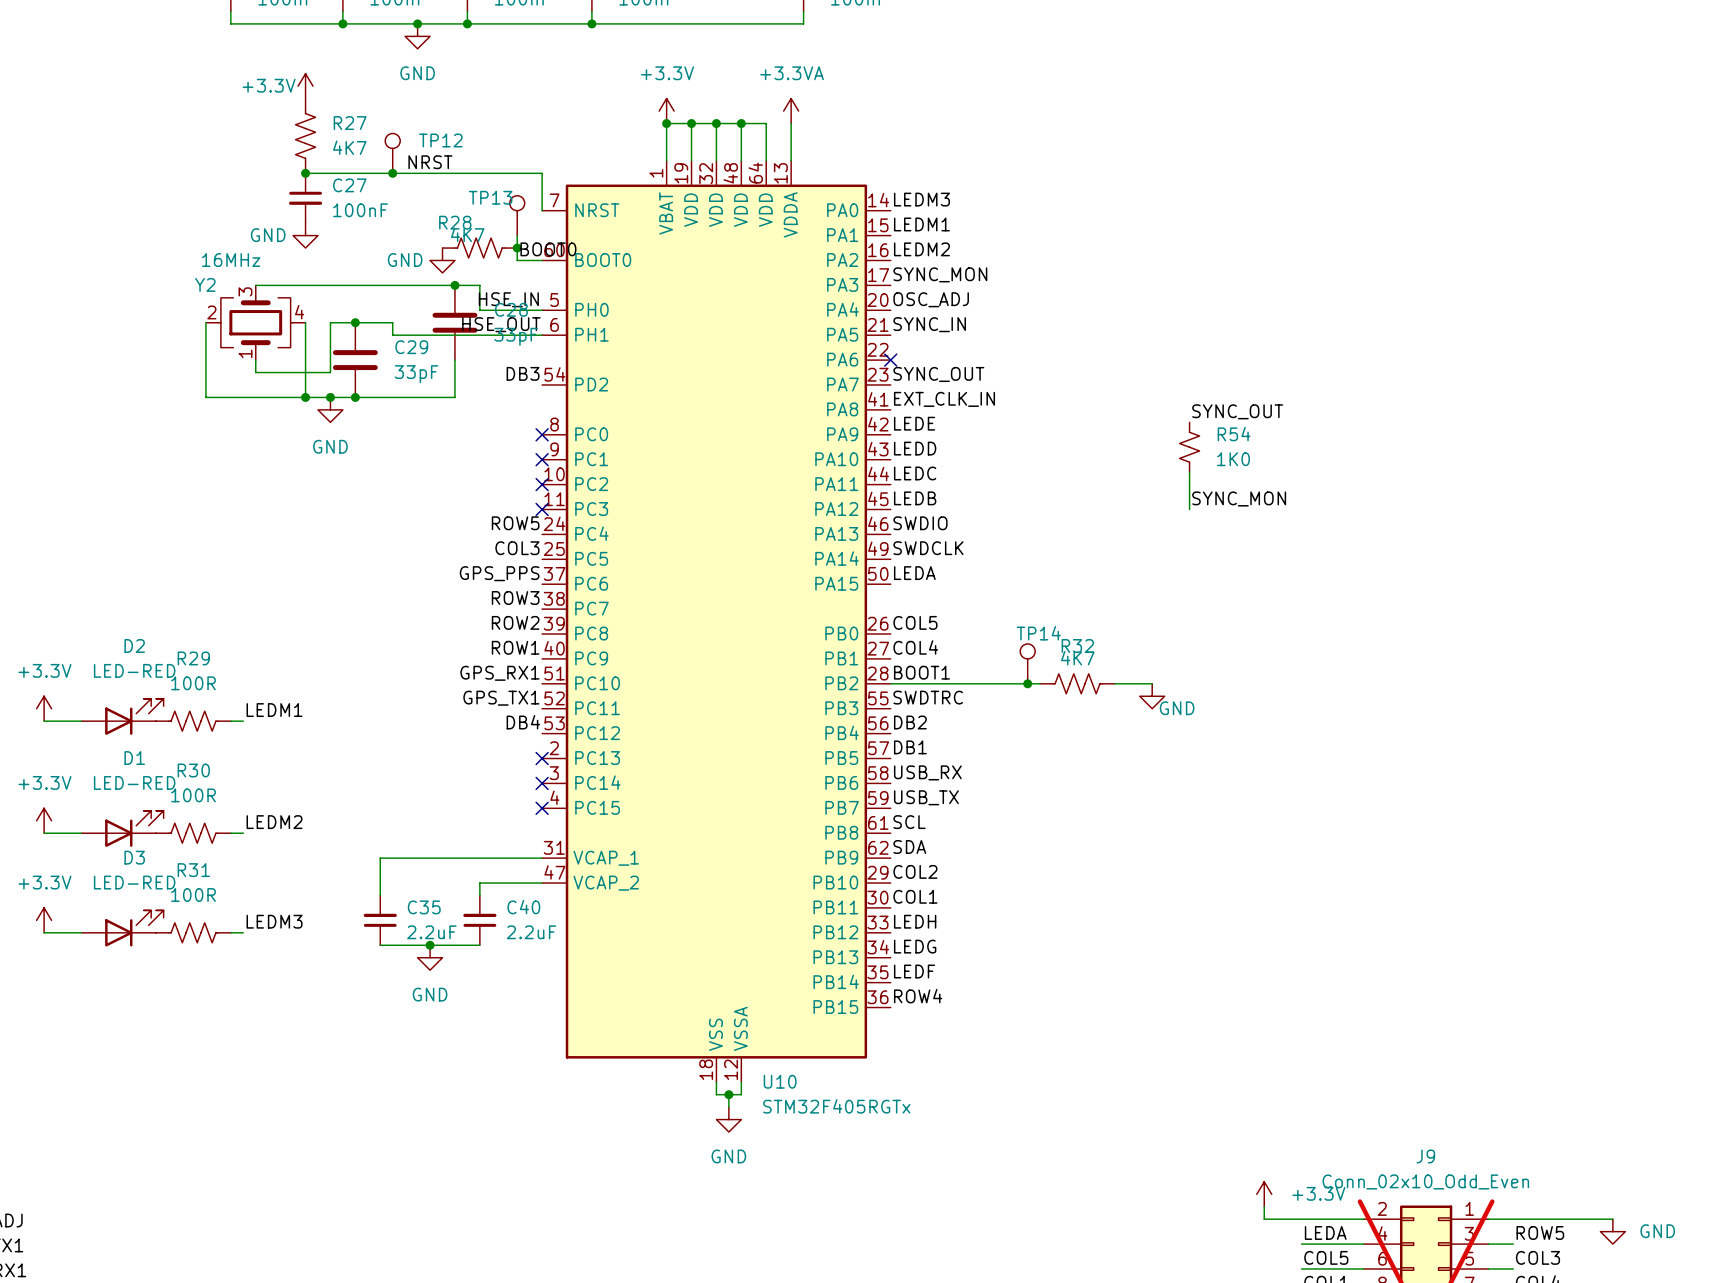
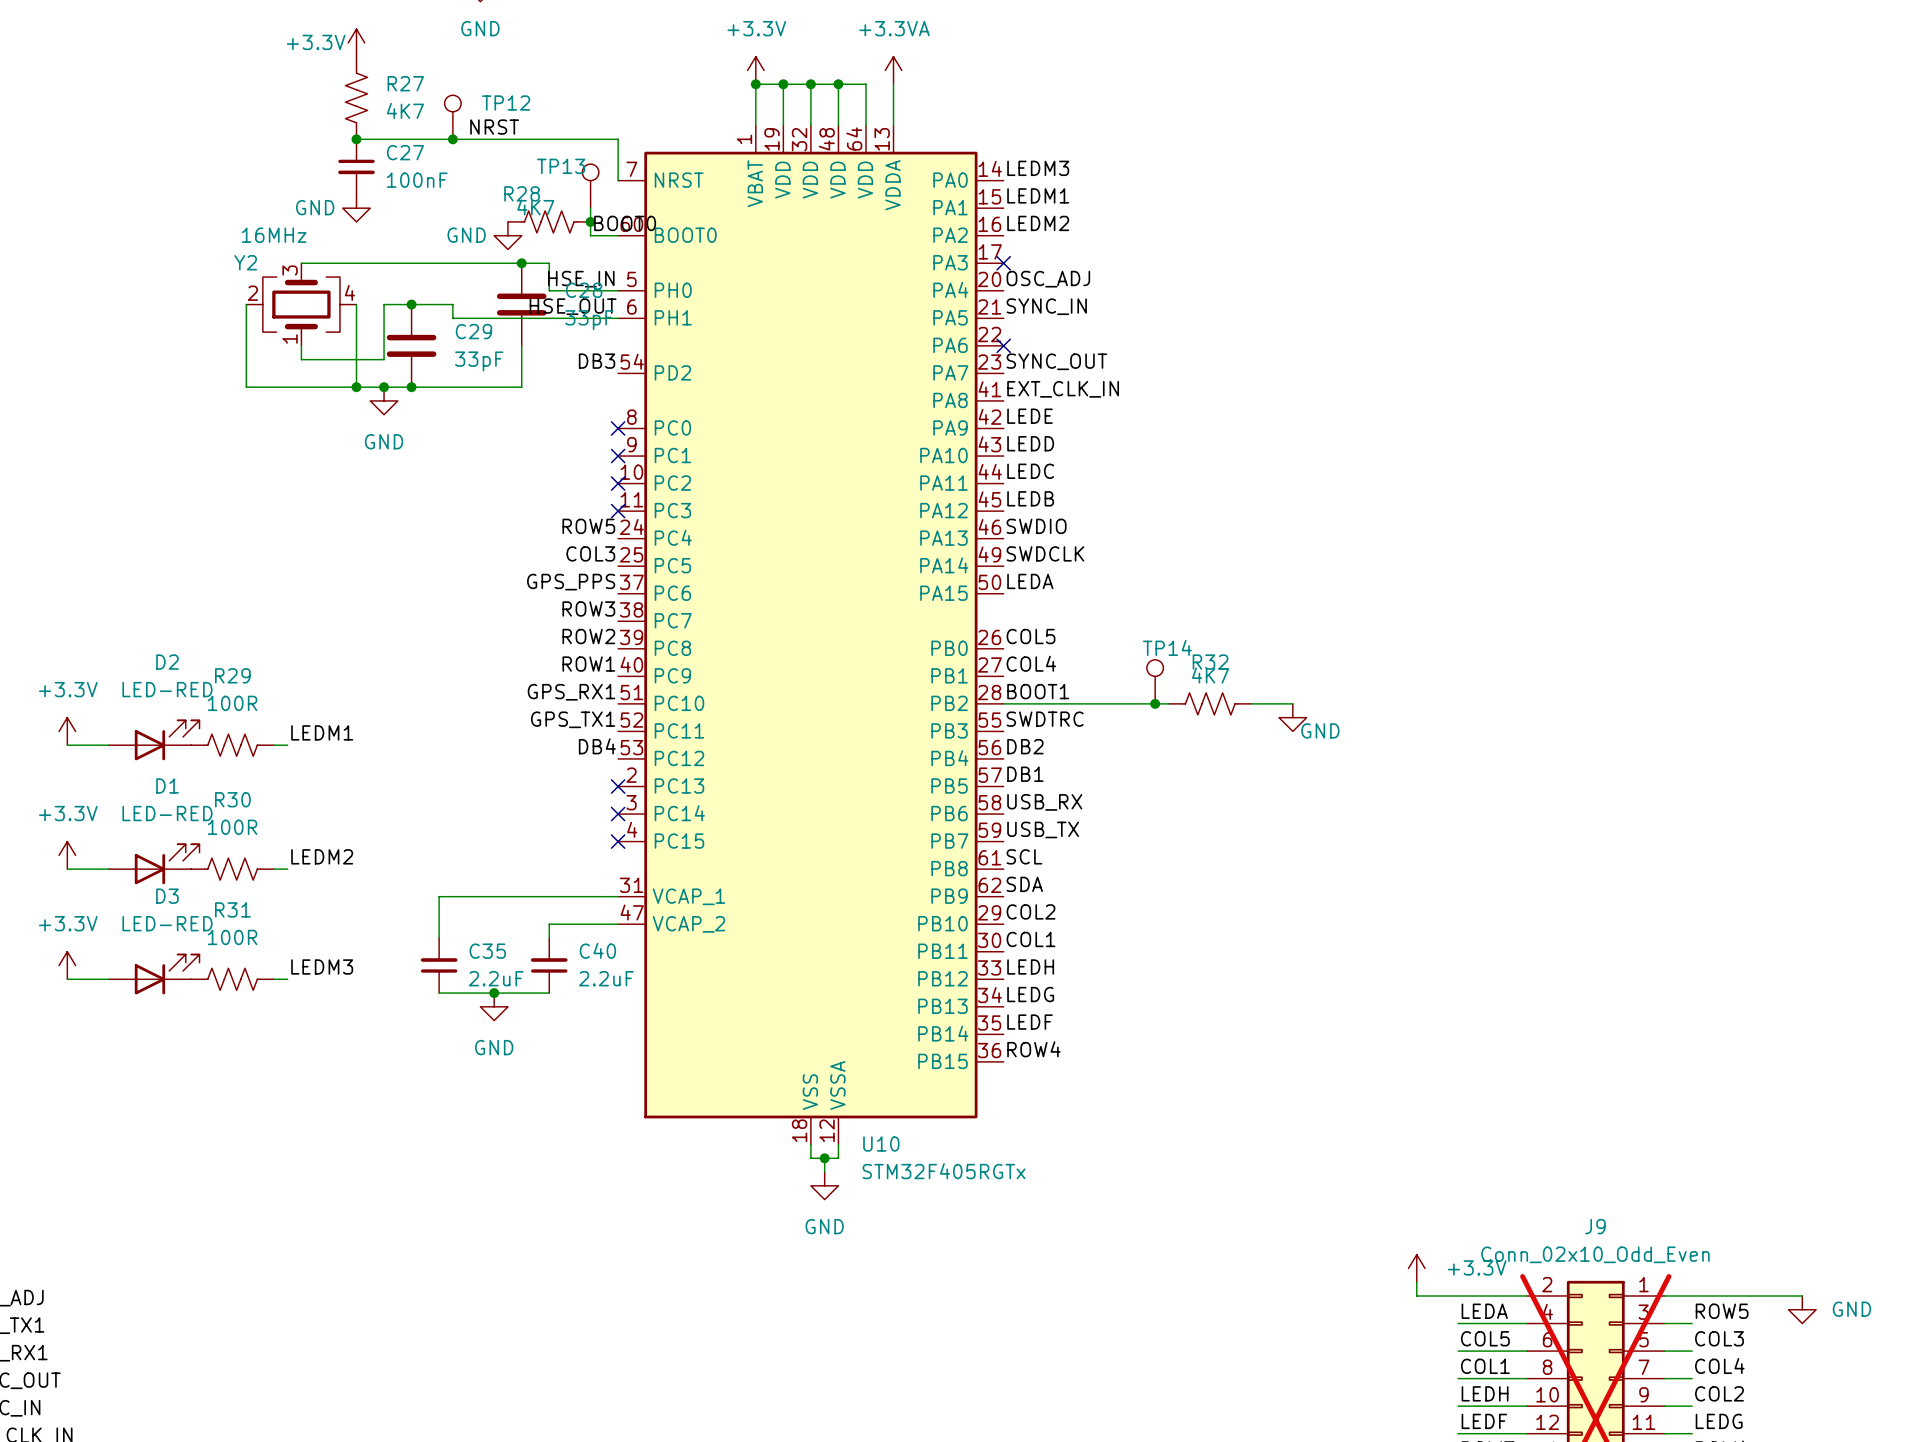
label: SYNC_MON (940, 274) -> none
no-connect mark: none -> (1003, 263)
label: SYNC_OUT (1237, 411) -> none
R54: 1K0 (1189, 447) -> none
wire: (1189, 472) (1189, 509) -> none
label: SYNC_MON (1239, 498) -> none

